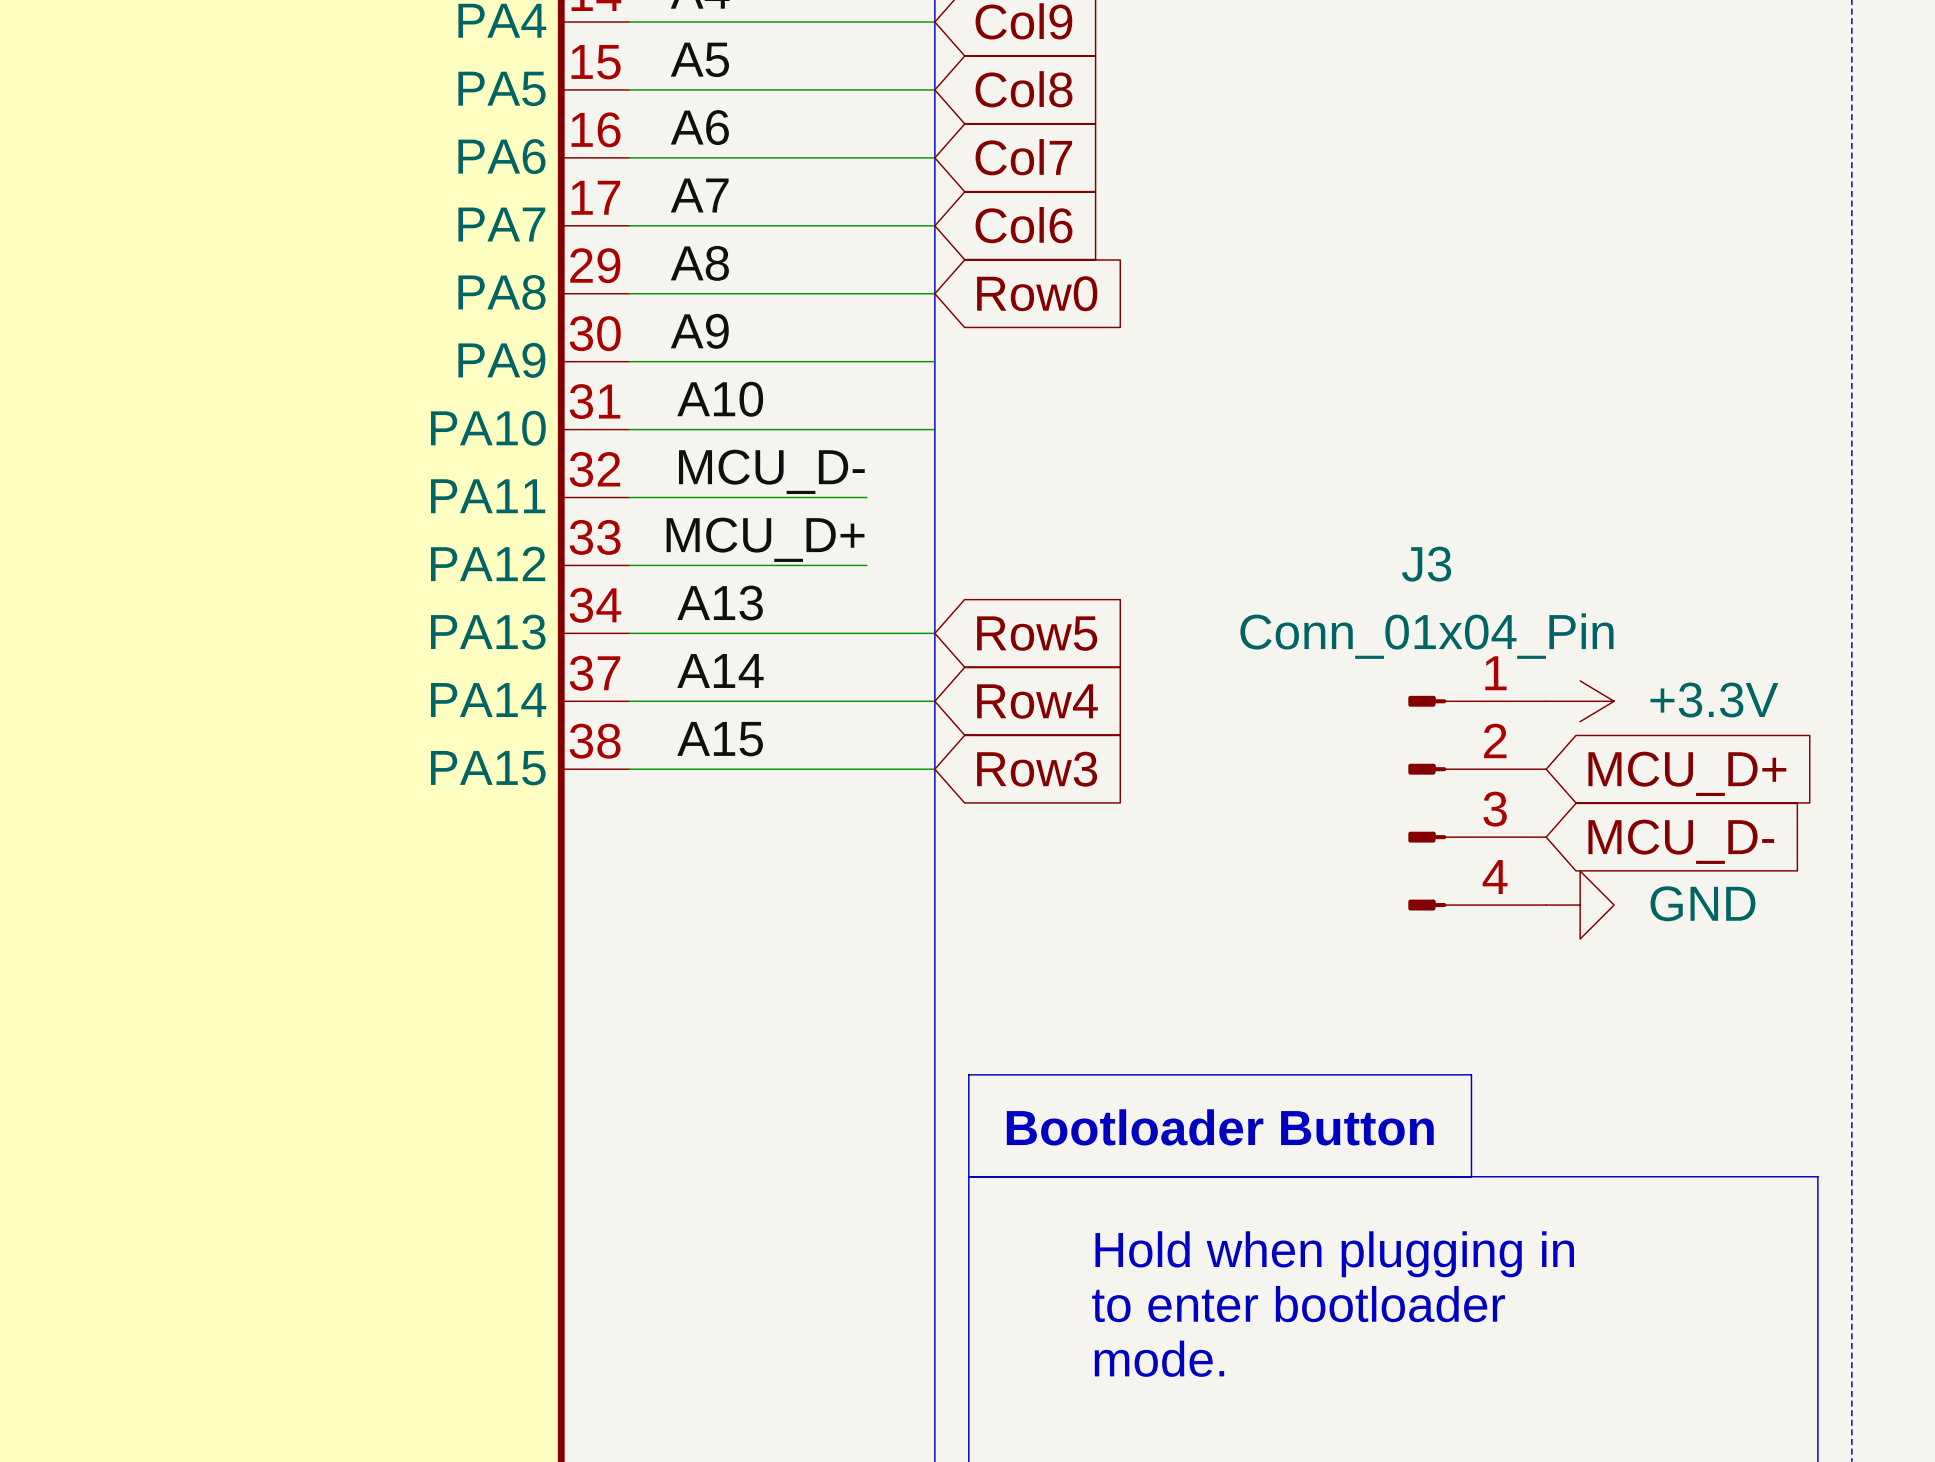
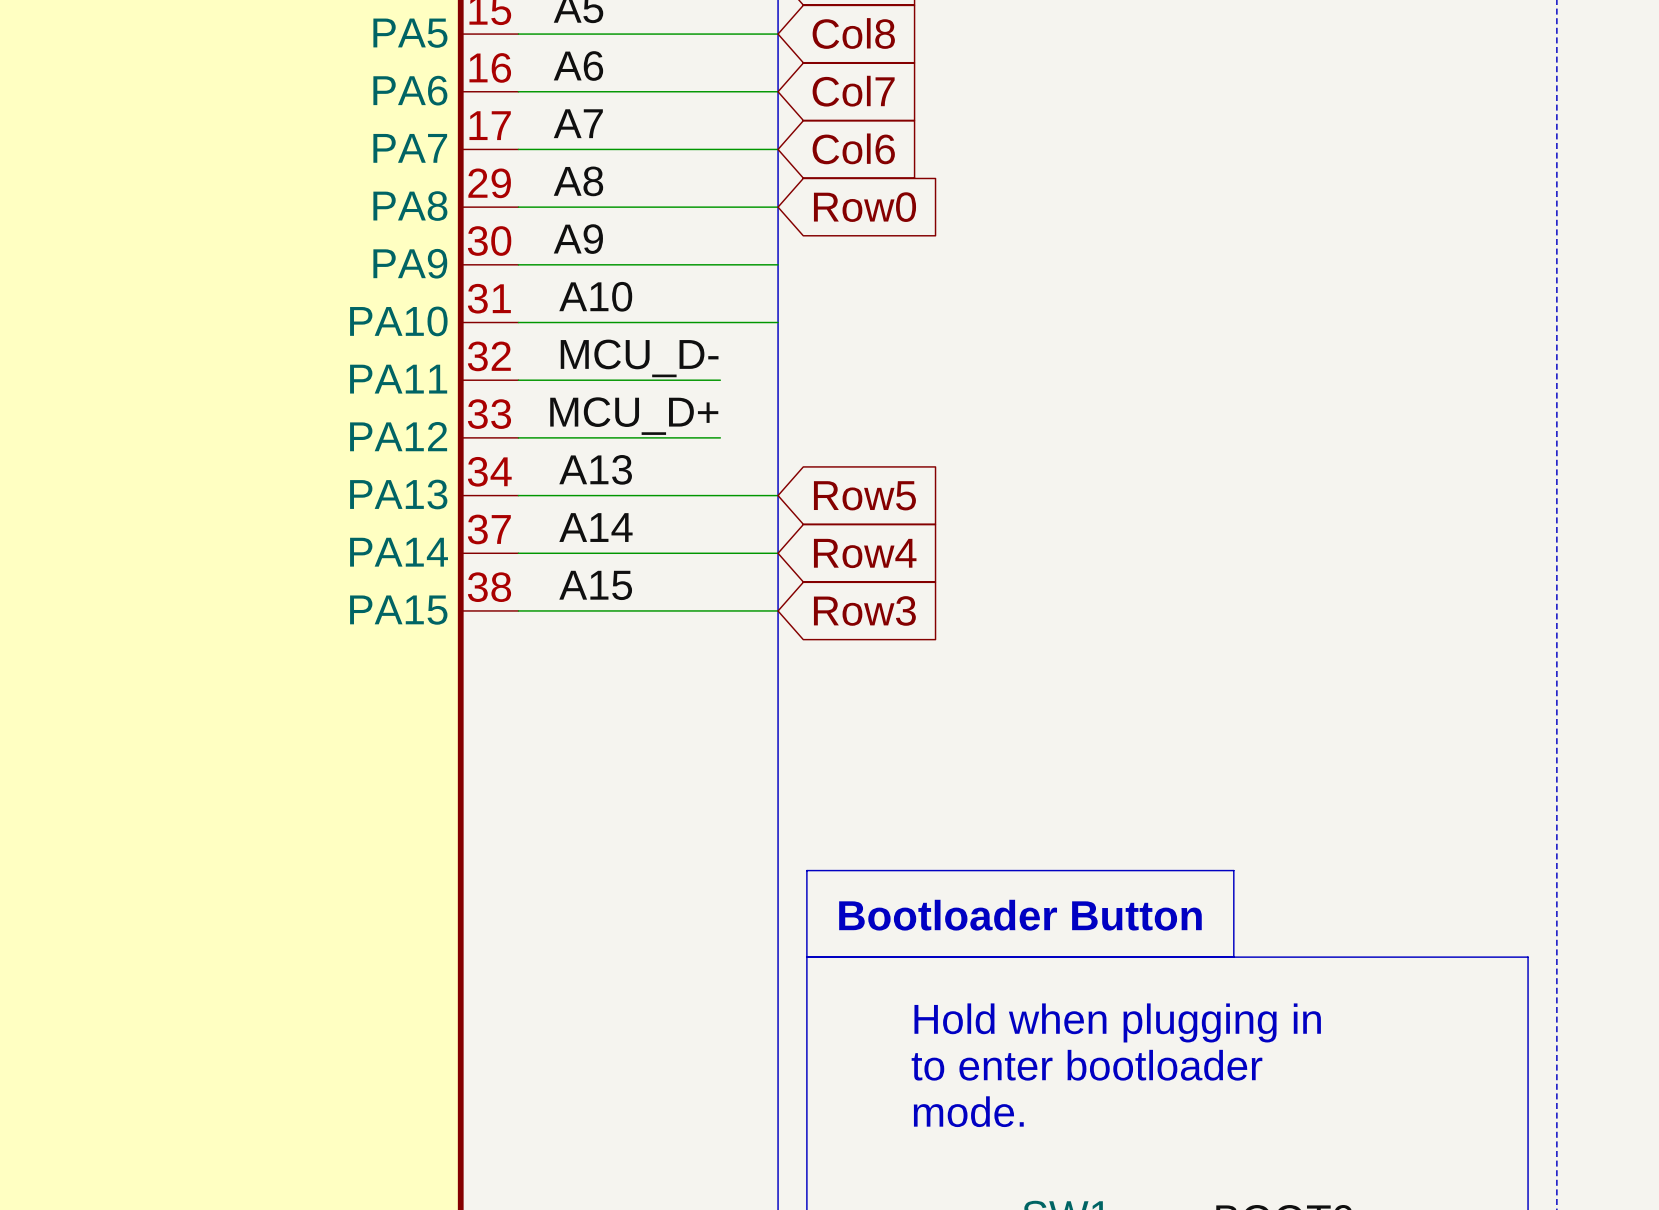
power symbol: +3.3V (1580, 701) -> none
global label: MCU_D+ (1687, 773) -> none
J3: Conn_01x04_Pin (1477, 803) -> none
global label: MCU_D- (1681, 841) -> none
power symbol: GND (1580, 905) -> none

